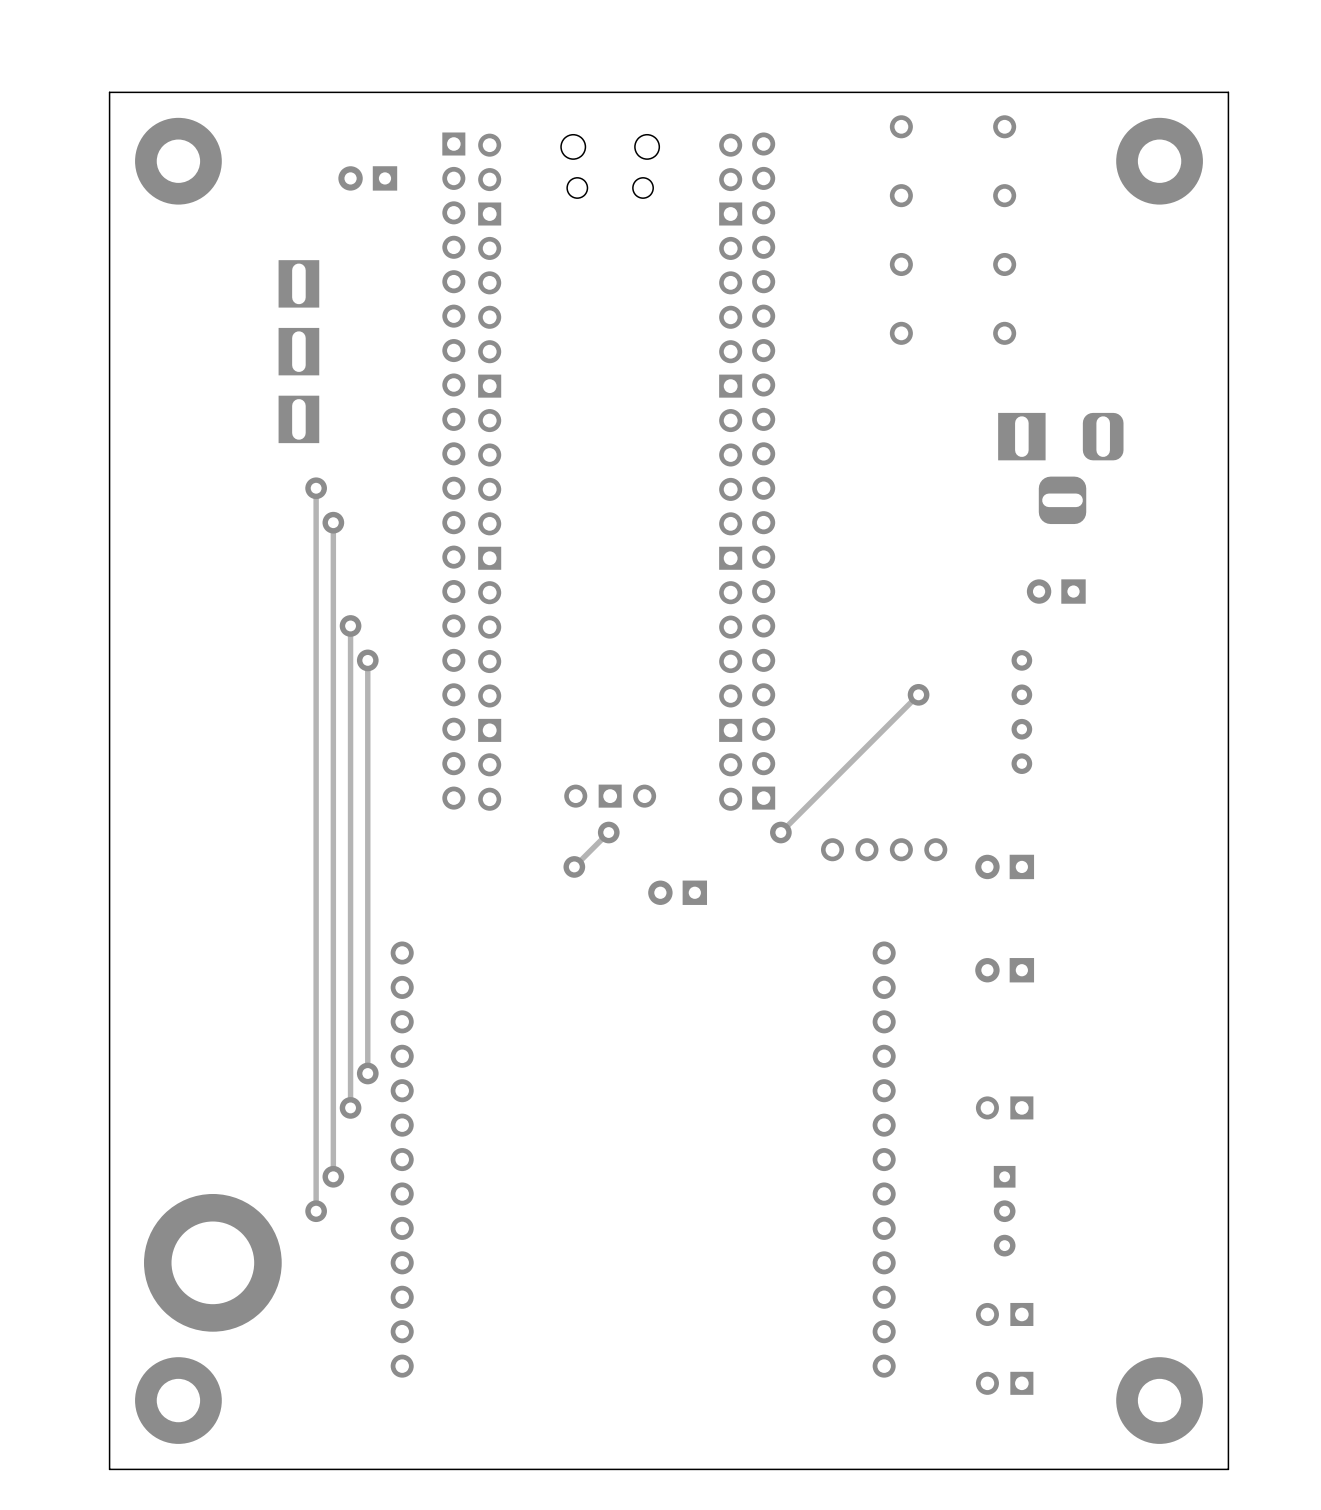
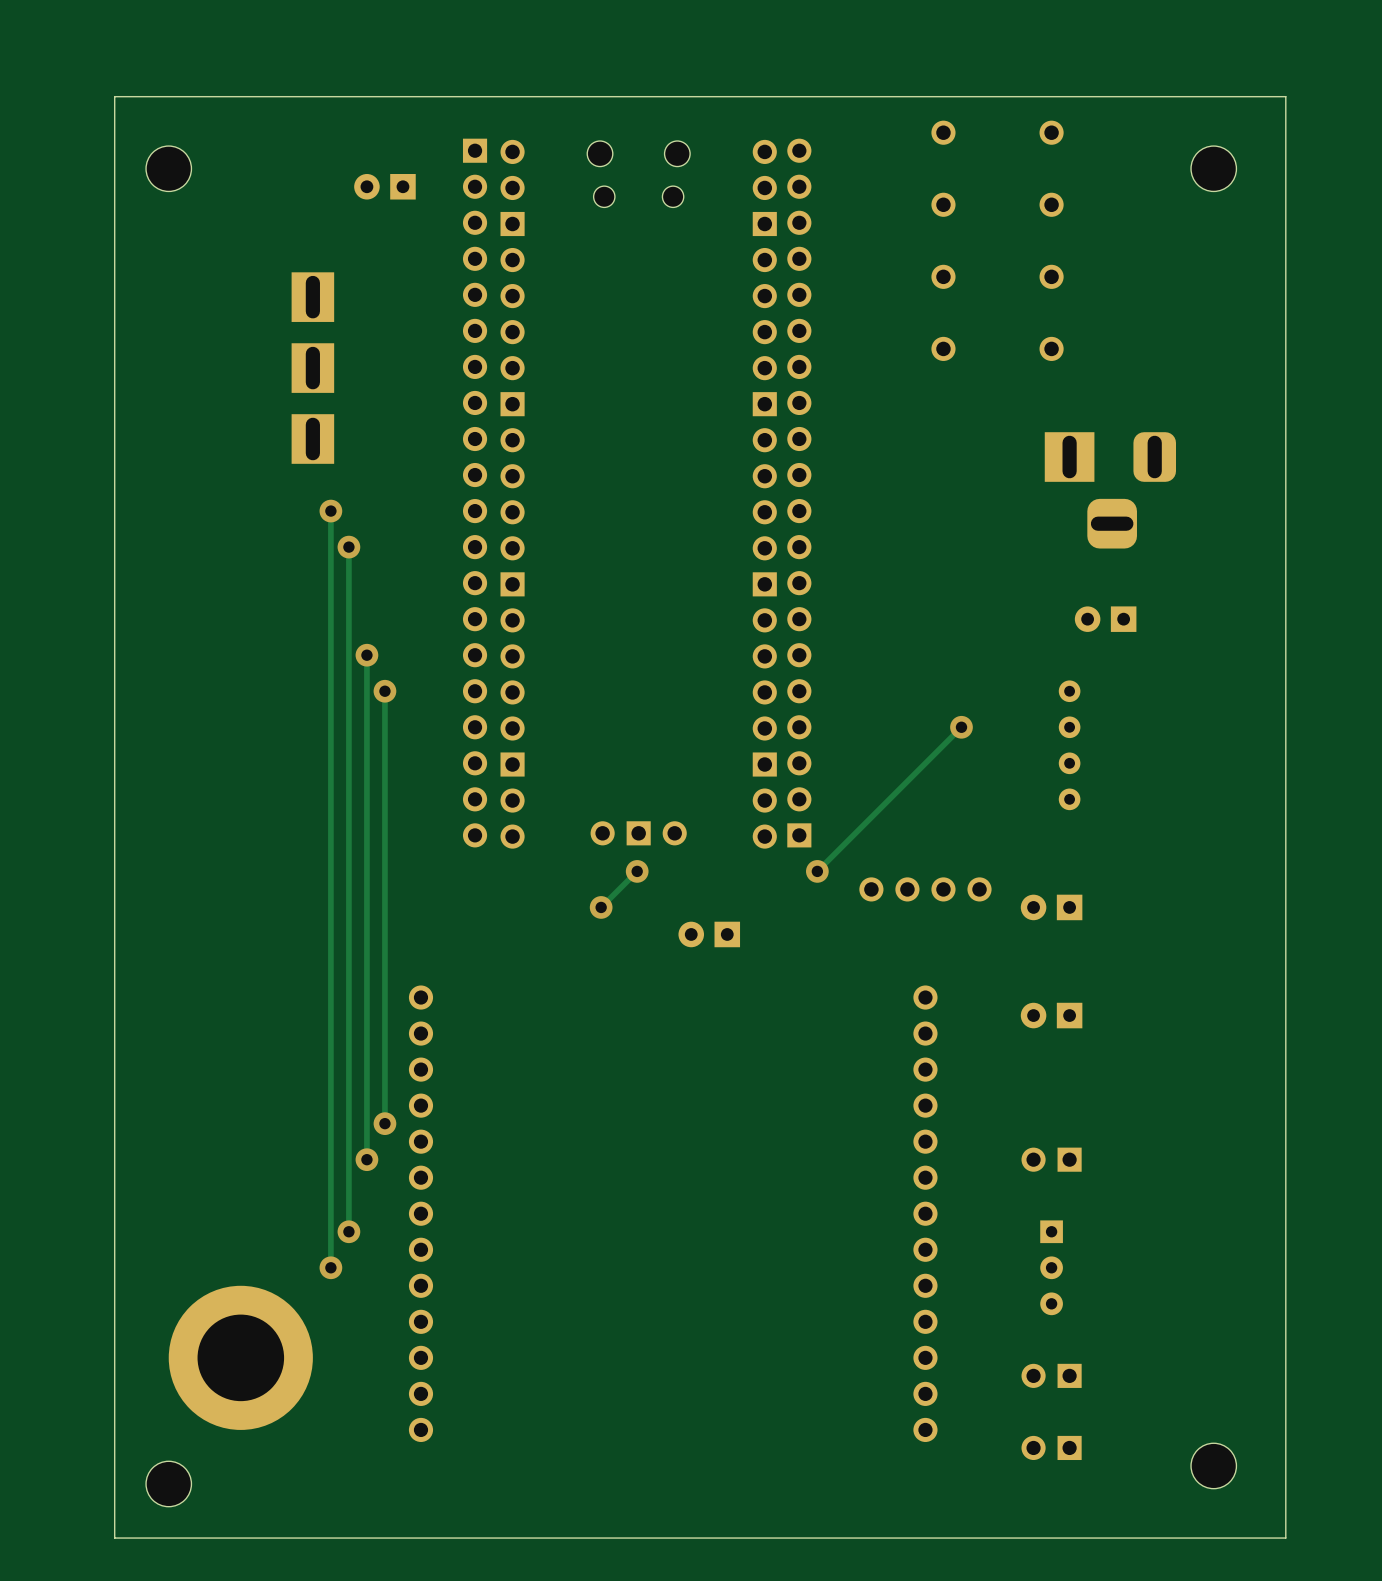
part footprint: [1116, 117, 1203, 205] -> [1191, 146, 1237, 192]
part: none -> (168, 168)
part: (178, 161) -> none
part position: (212, 1262) -> (240, 1357)
part footprint: [1116, 1357, 1203, 1444] -> [1191, 1443, 1237, 1489]
part: (178, 1400) -> none
part: none -> (168, 1483)

